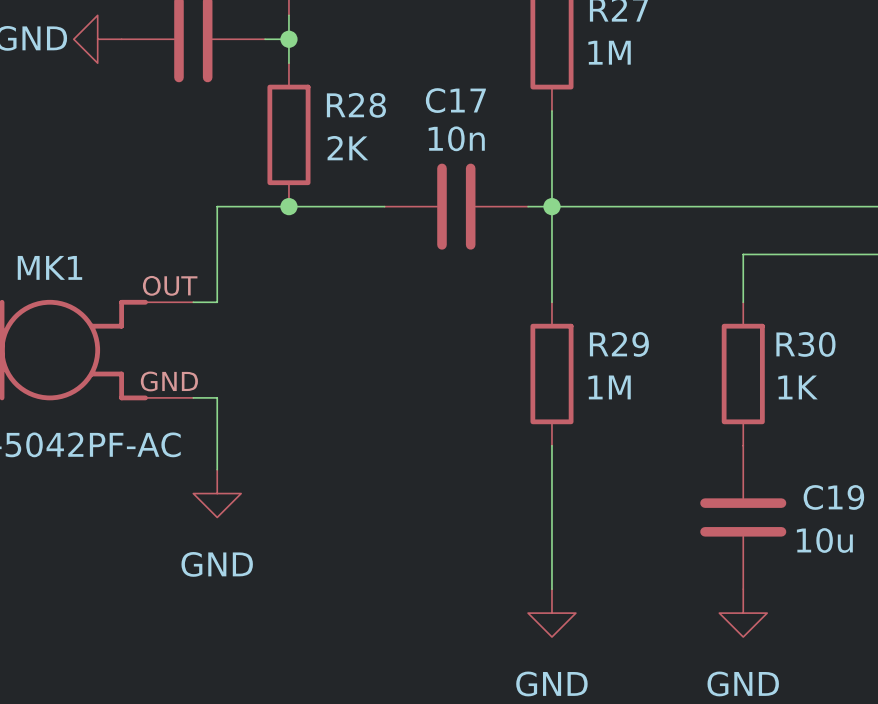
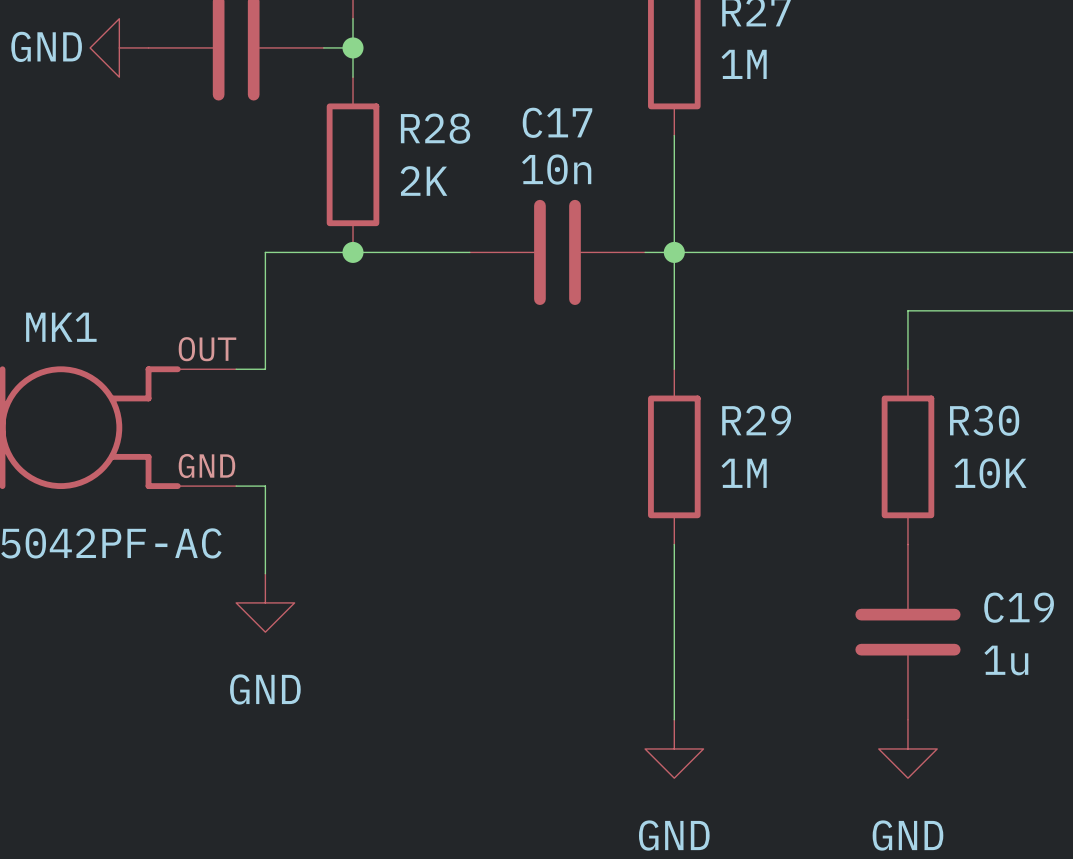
R30 value: 1K (798, 387) -> 10K (990, 473)
C19 value: 10u (824, 540) -> 1u (1006, 660)

